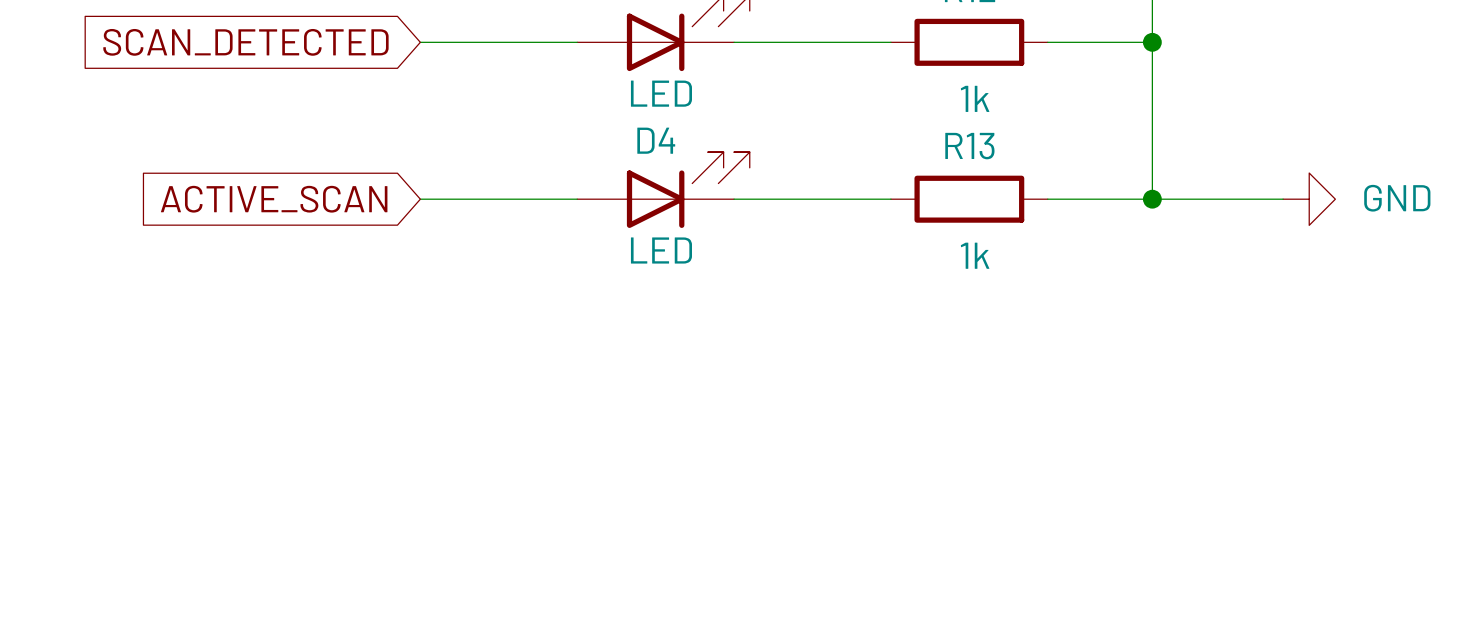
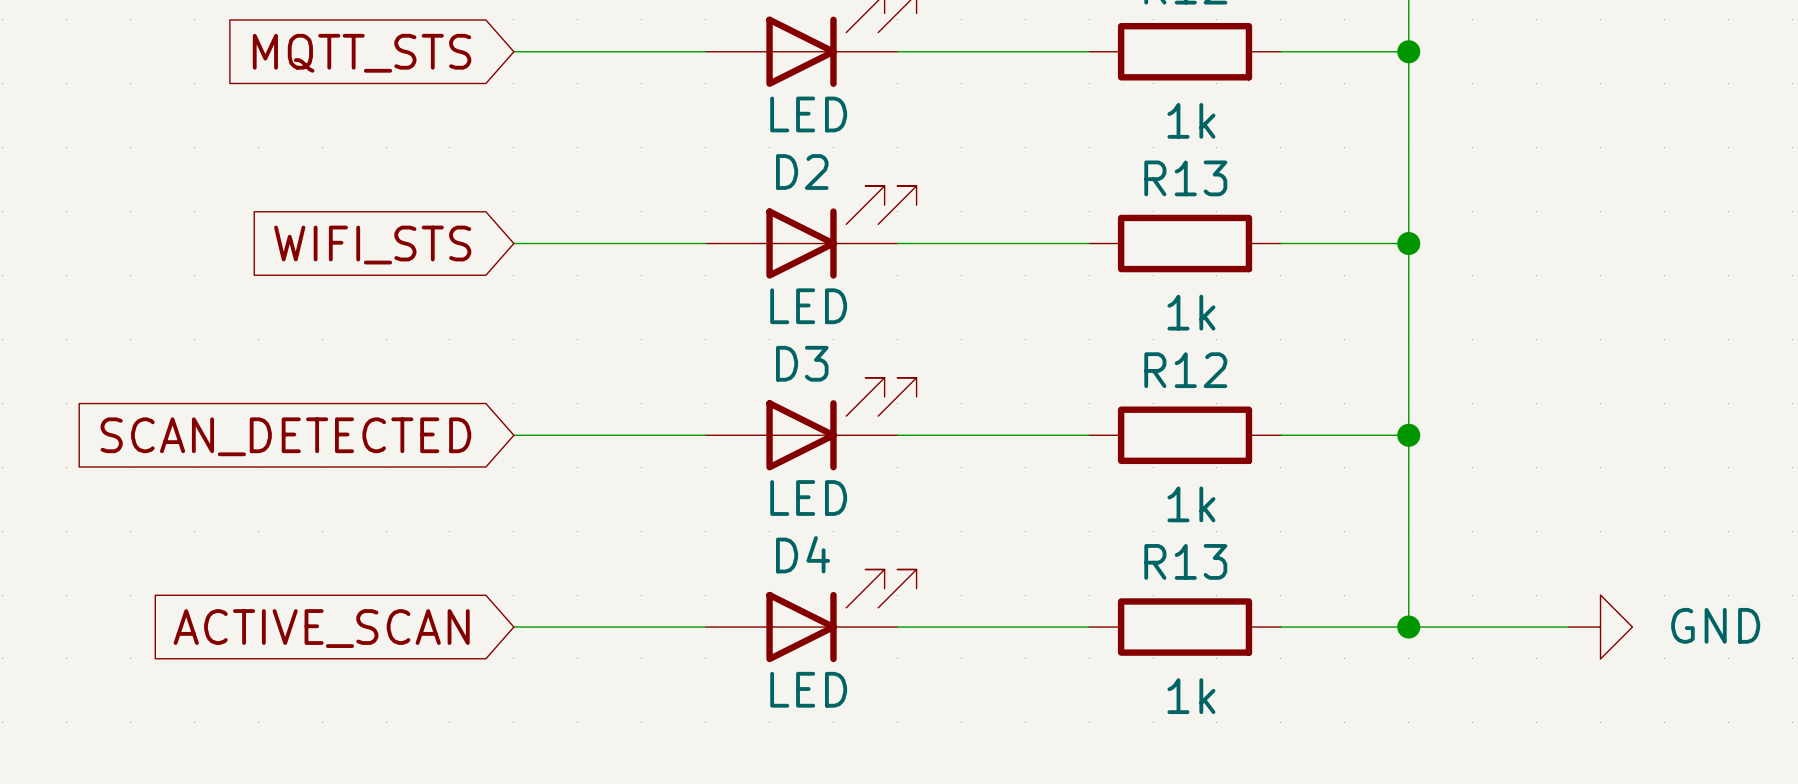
global label: SCAN_DETECTED (245, 42) -> MQTT_STS (362, 53)
D4 name: D4 (656, 140) -> D2 (802, 172)
global label: ACTIVE_SCAN (274, 199) -> WIFI_STS (372, 245)
wire: (1152, 199) (1283, 199) -> (1408, 243) (1408, 627)
power symbol position: GND (1309, 199) -> GND (1600, 627)
D3: none -> LED (811, 424)
global label: none -> SCAN_DETECTED (285, 436)
wire: none -> (513, 435) (705, 435)
wire: none -> (897, 435) (1089, 435)
R12: none -> 1k (1185, 435)
wire: none -> (1280, 435) (1408, 435)
junction: none -> (1408, 435)
D4: none -> LED (811, 615)
global label: none -> ACTIVE_SCAN (321, 628)
wire: none -> (513, 627) (705, 627)
wire: none -> (897, 627) (1089, 627)
R13: none -> 1k (1185, 627)
wire: none -> (1280, 627) (1568, 627)
junction: none -> (1408, 627)

